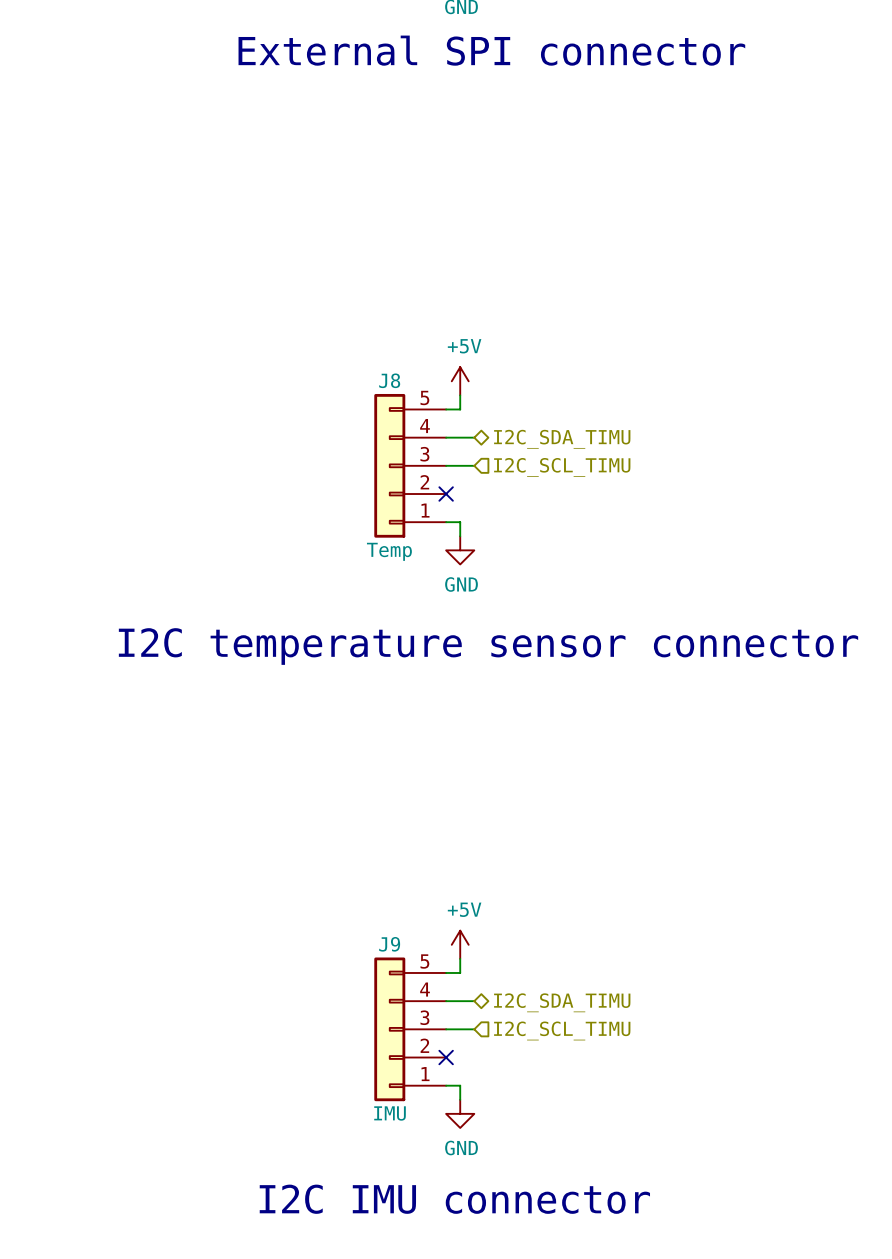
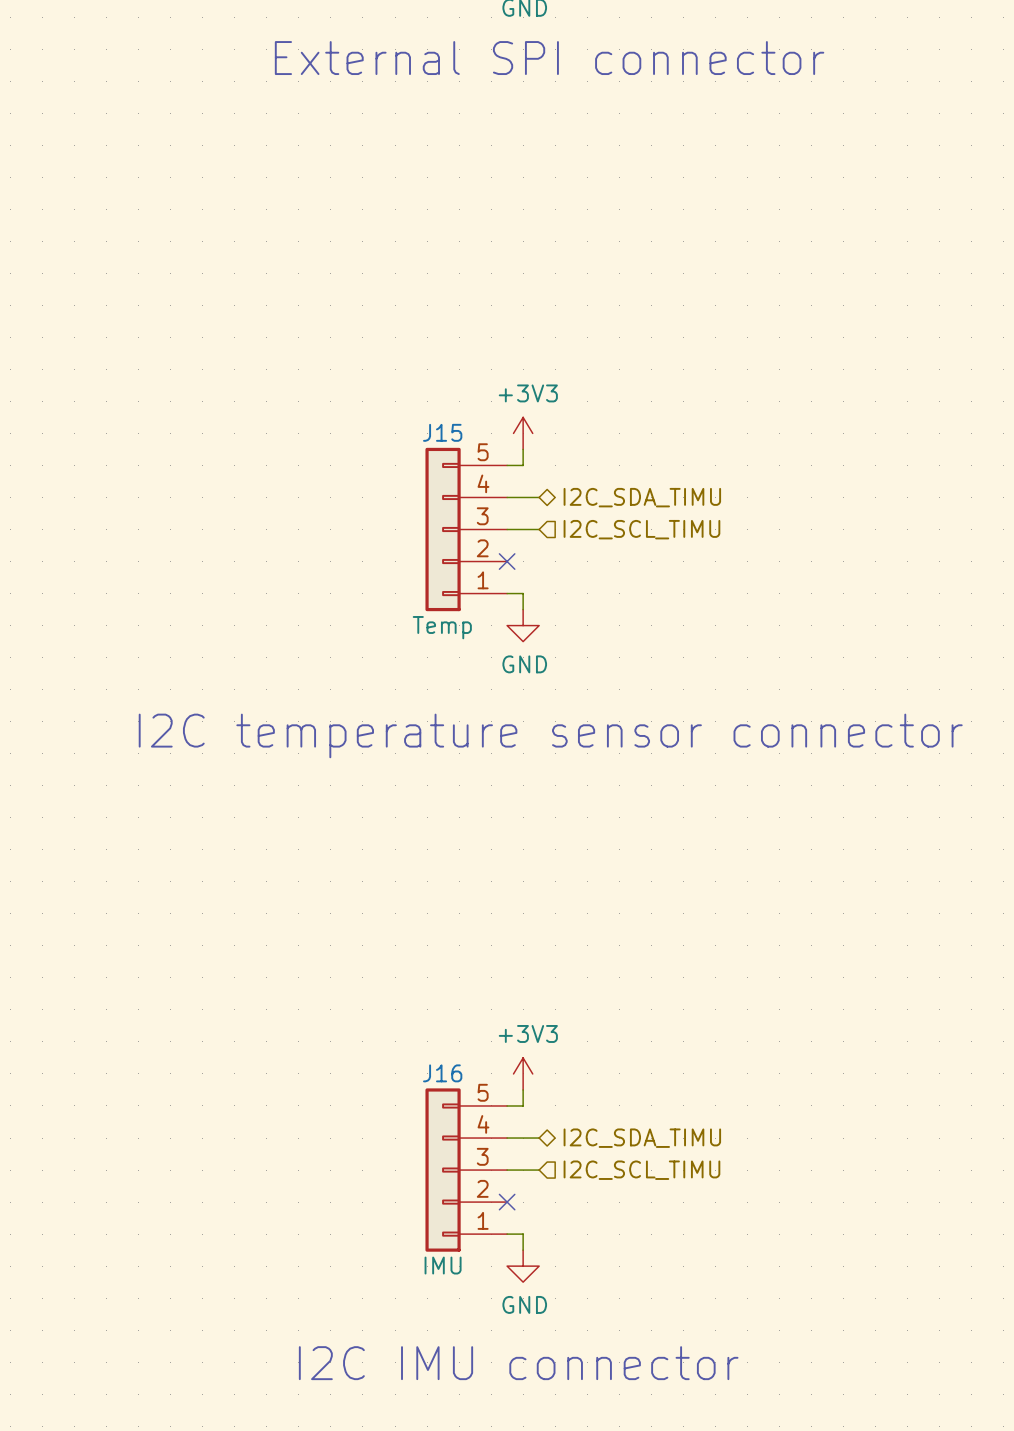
J8 name: J8 (389, 380) -> J15 (442, 432)
power symbol: +5V (460, 381) -> +3V3 (523, 433)
J9 name: J9 (389, 944) -> J16 (442, 1073)
power symbol: +5V (460, 944) -> +3V3 (523, 1073)

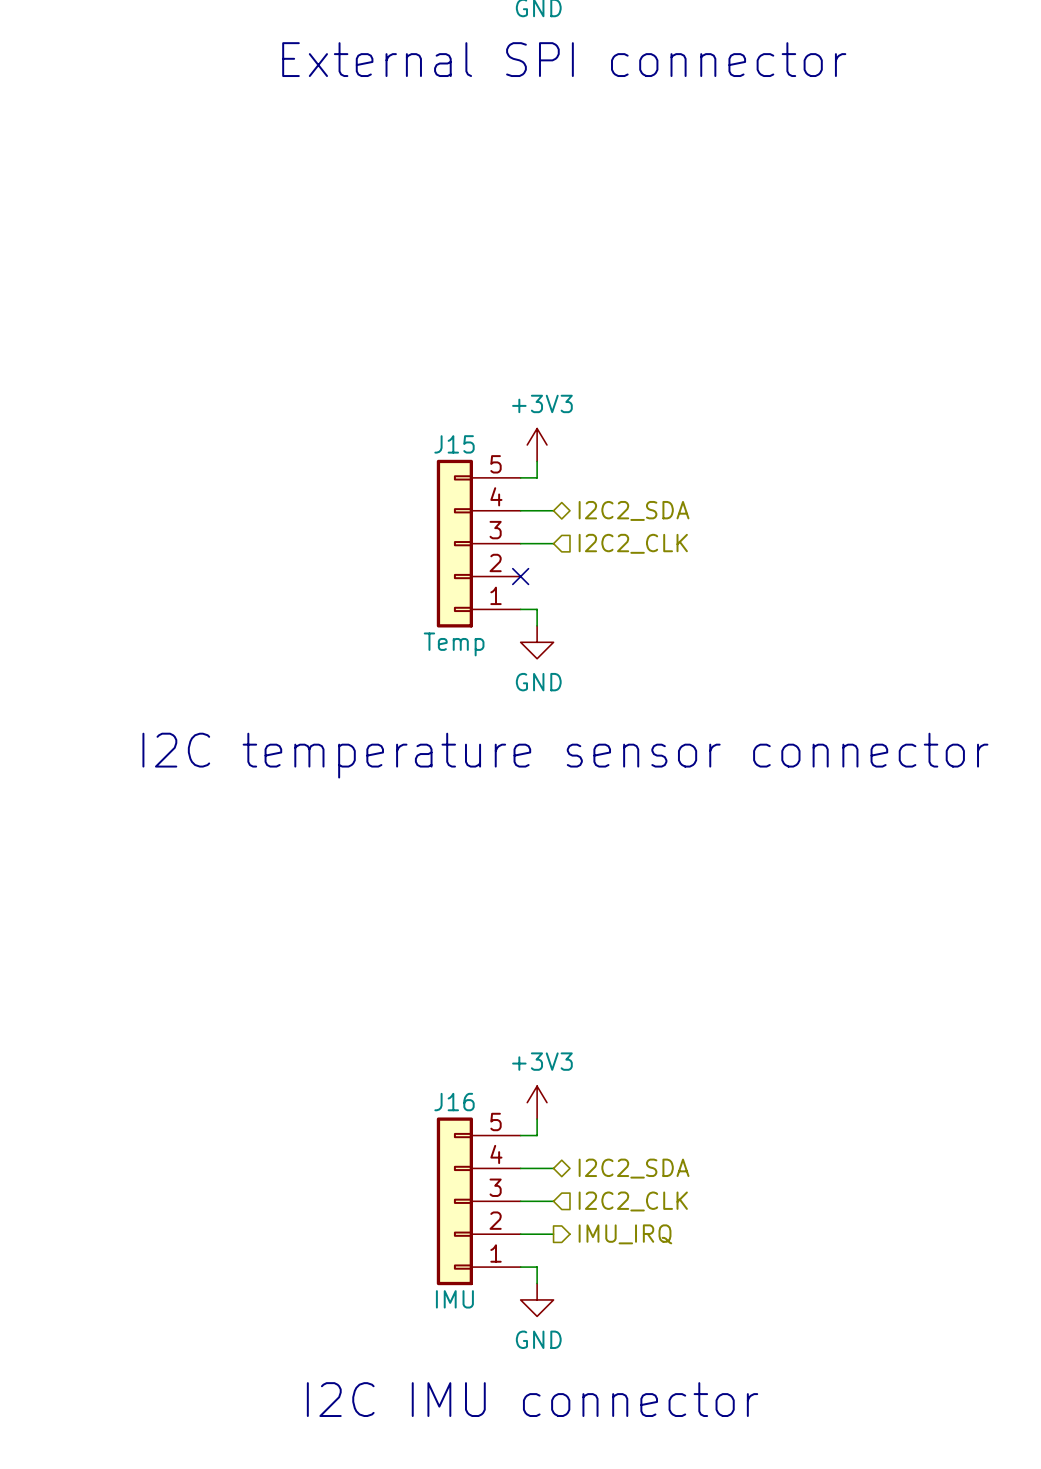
hierarchical label: I2C_SDA_TIMU (642, 497) -> I2C2_SDA (634, 510)
hierarchical label: I2C_SCL_TIMU (641, 529) -> I2C2_CLK (633, 543)
hierarchical label: I2C_SDA_TIMU (642, 1138) -> I2C2_SDA (634, 1168)
hierarchical label: I2C_SCL_TIMU (641, 1170) -> I2C2_CLK (633, 1201)
wire: none -> (520, 1234) (553, 1234)
no-connect mark: (507, 1202) -> none
hierarchical label: none -> IMU_IRQ (625, 1234)

